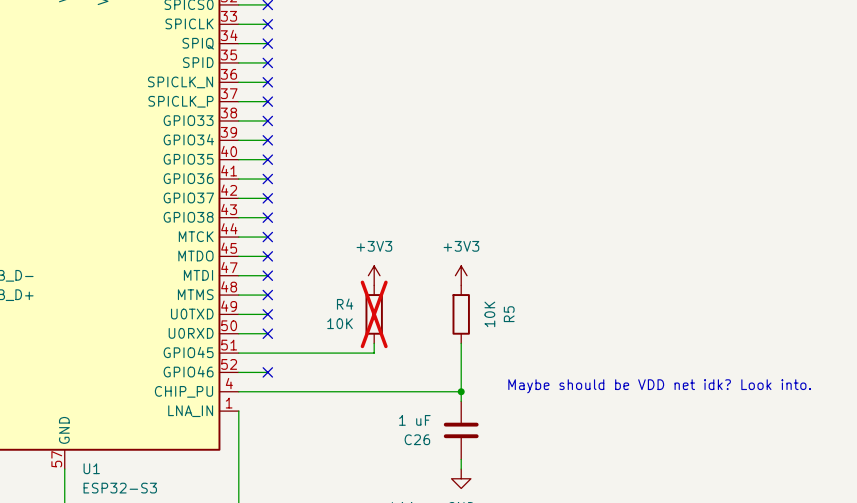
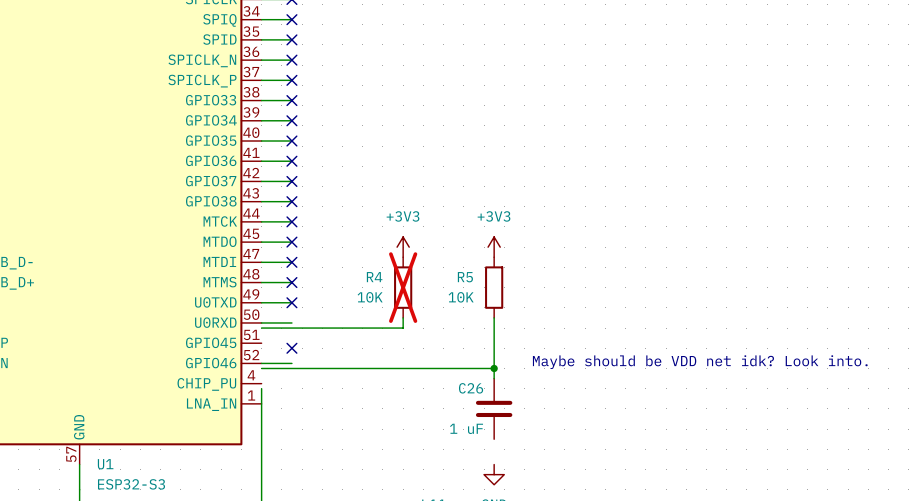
power symbol position: +3V3 (374, 275) -> +3V3 (403, 247)
power symbol position: +3V3 (461, 275) -> +3V3 (494, 247)
R4 position: (374, 314) -> (403, 287)
R5 position: (461, 314) -> (494, 287)
R5 value rotation: 0° (489, 314) -> 90° clockwise (461, 297)
R5 value position: 10K (489, 314) -> 10K (461, 297)
R5 name rotation: 0° (509, 314) -> 90° clockwise (465, 277)
R5 name position: R5 (509, 314) -> R5 (465, 277)
no-connect mark: (267, 333) -> none
wire: (374, 343) (374, 353) (238, 353) -> (403, 317) (403, 328) (261, 328)
no-connect mark: none -> (291, 348)
no-connect mark: (267, 372) -> none
text position: Maybe should be VDD net idk? Look into. (659, 386) -> Maybe should be VDD net idk? Look into. (700, 362)
wire: (238, 391) (461, 391) -> (261, 368) (494, 368)
junction position: (461, 391) -> (494, 368)
wire: none -> (261, 388) (261, 403)
C26 value position: 1 uF (414, 420) -> 1 uF (466, 428)
C26 position: (461, 430) -> (494, 408)
C26 name position: C26 (417, 439) -> C26 (471, 388)
wire: (461, 459) (461, 469) -> none

